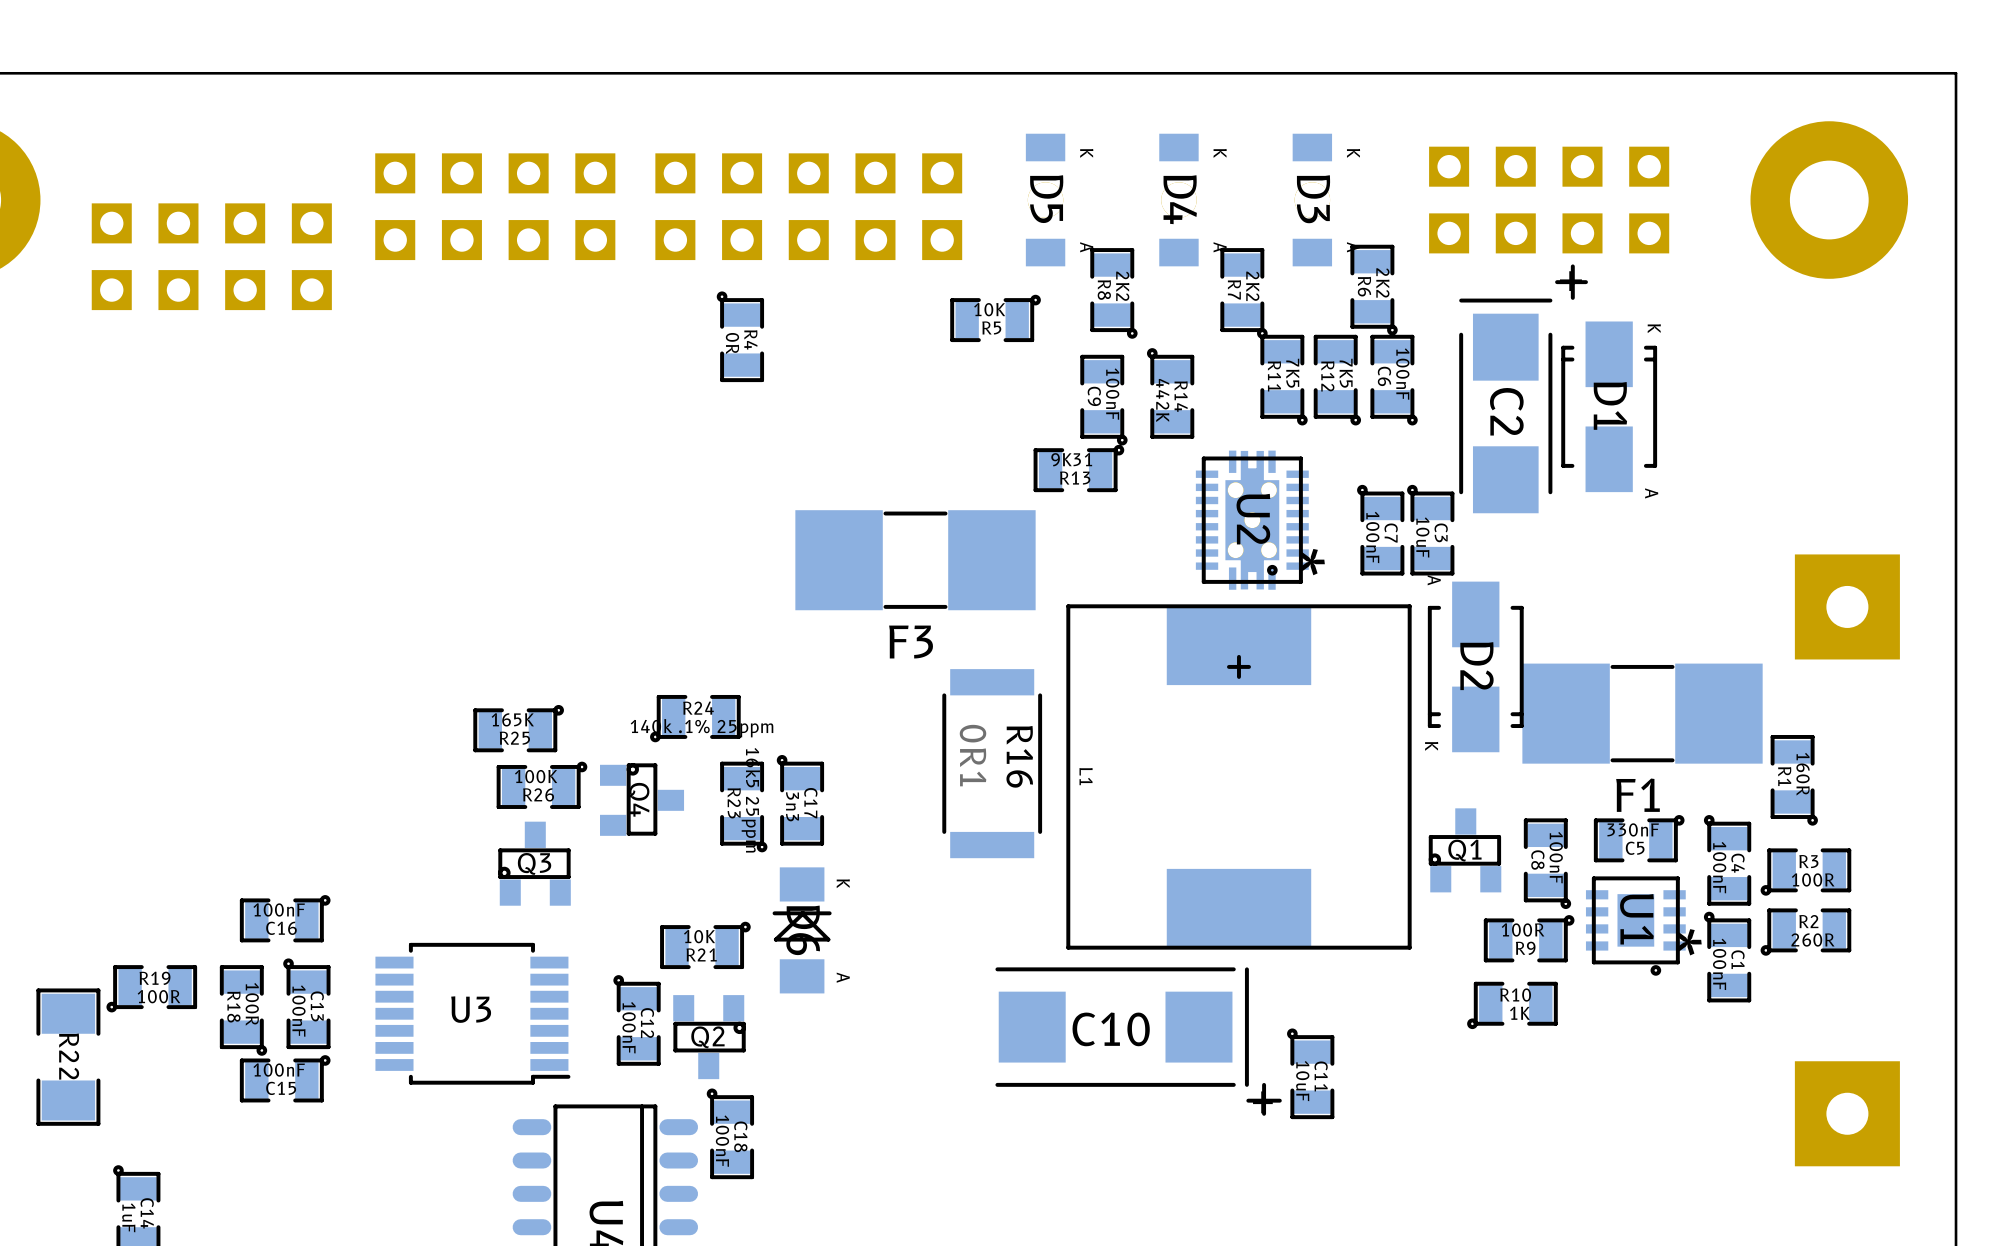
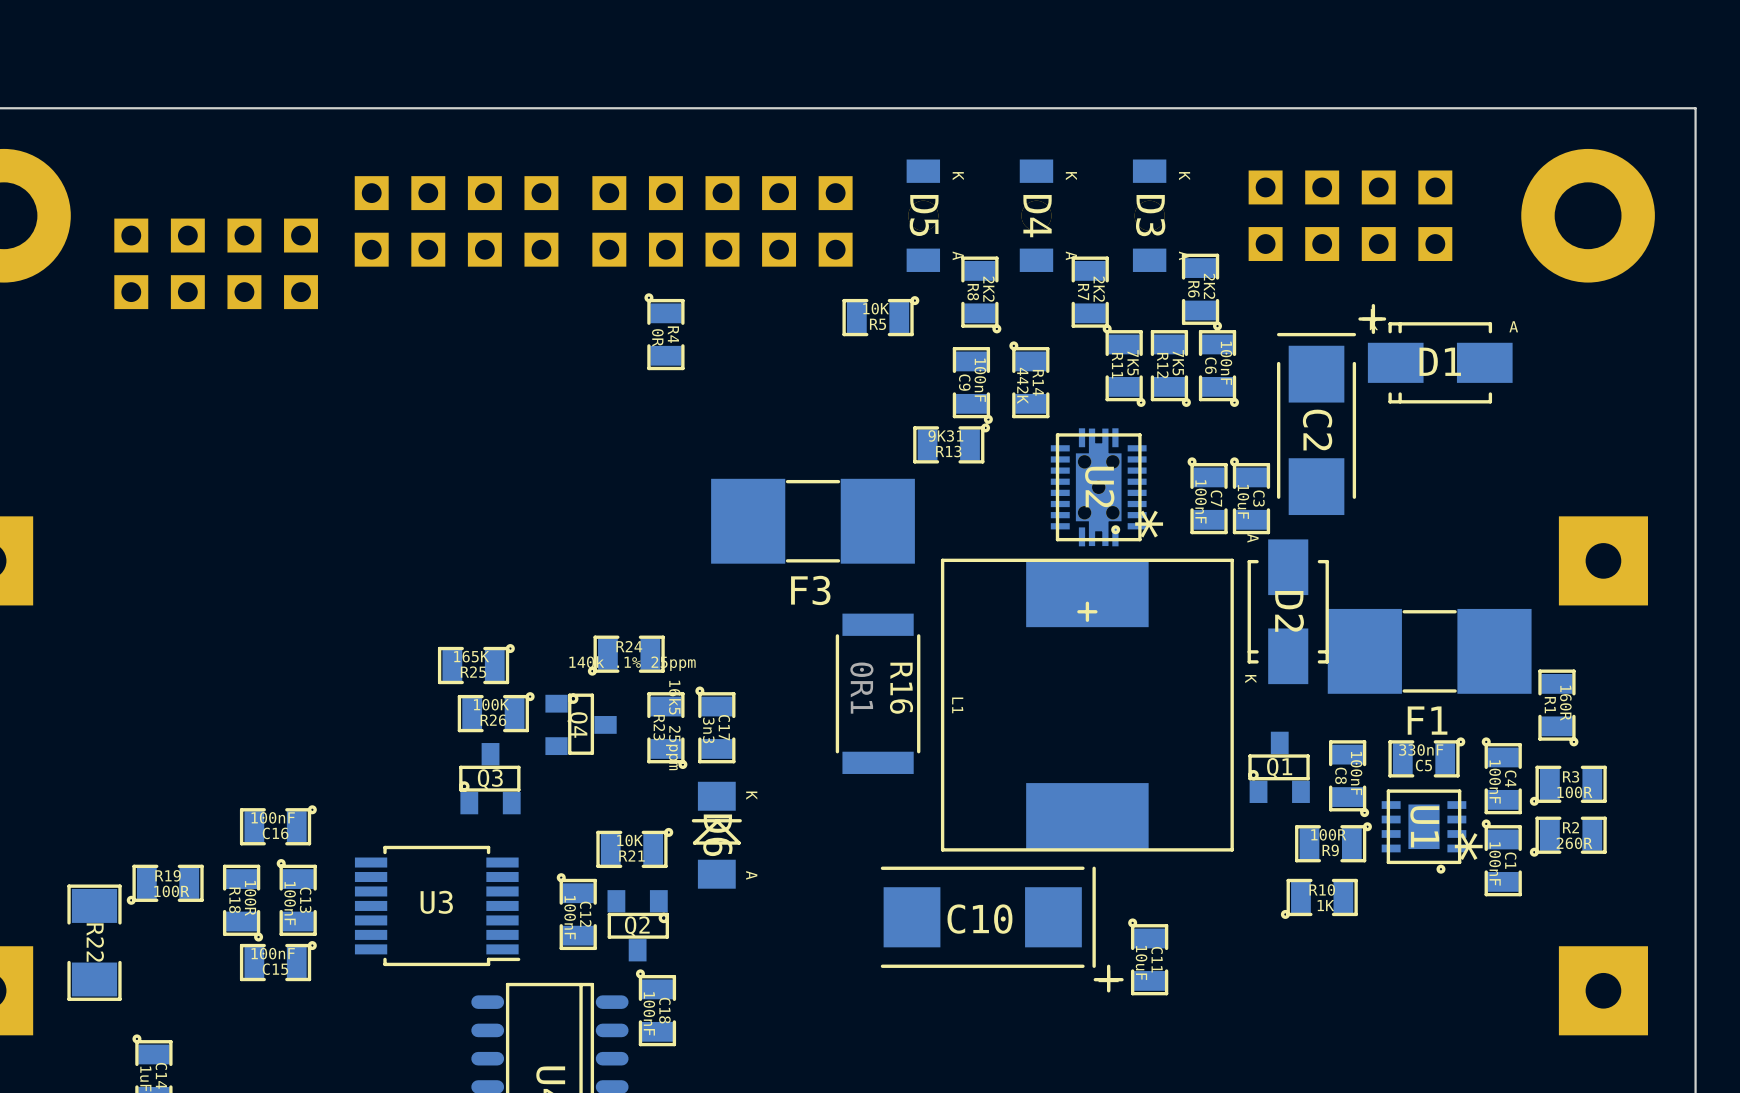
C2 position: (1523, 388) -> (1331, 409)
D1 rotation: 0° (1609, 406) -> 90° counterclockwise (1440, 362)

